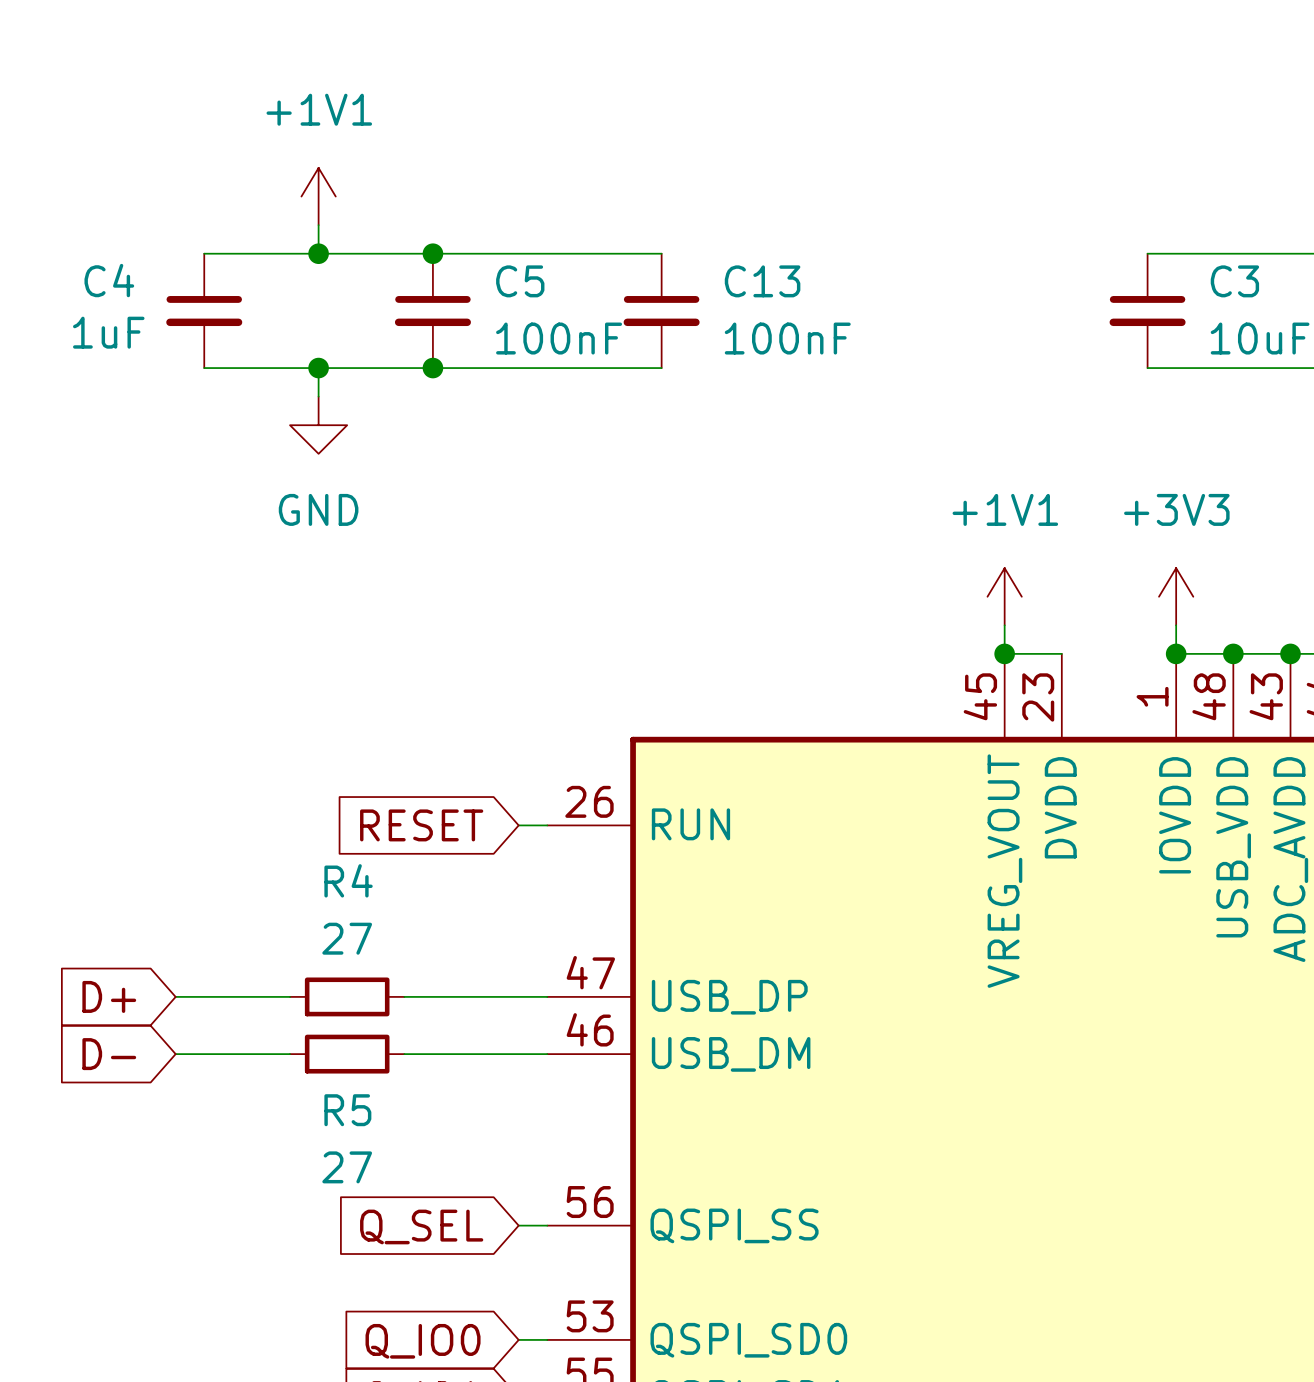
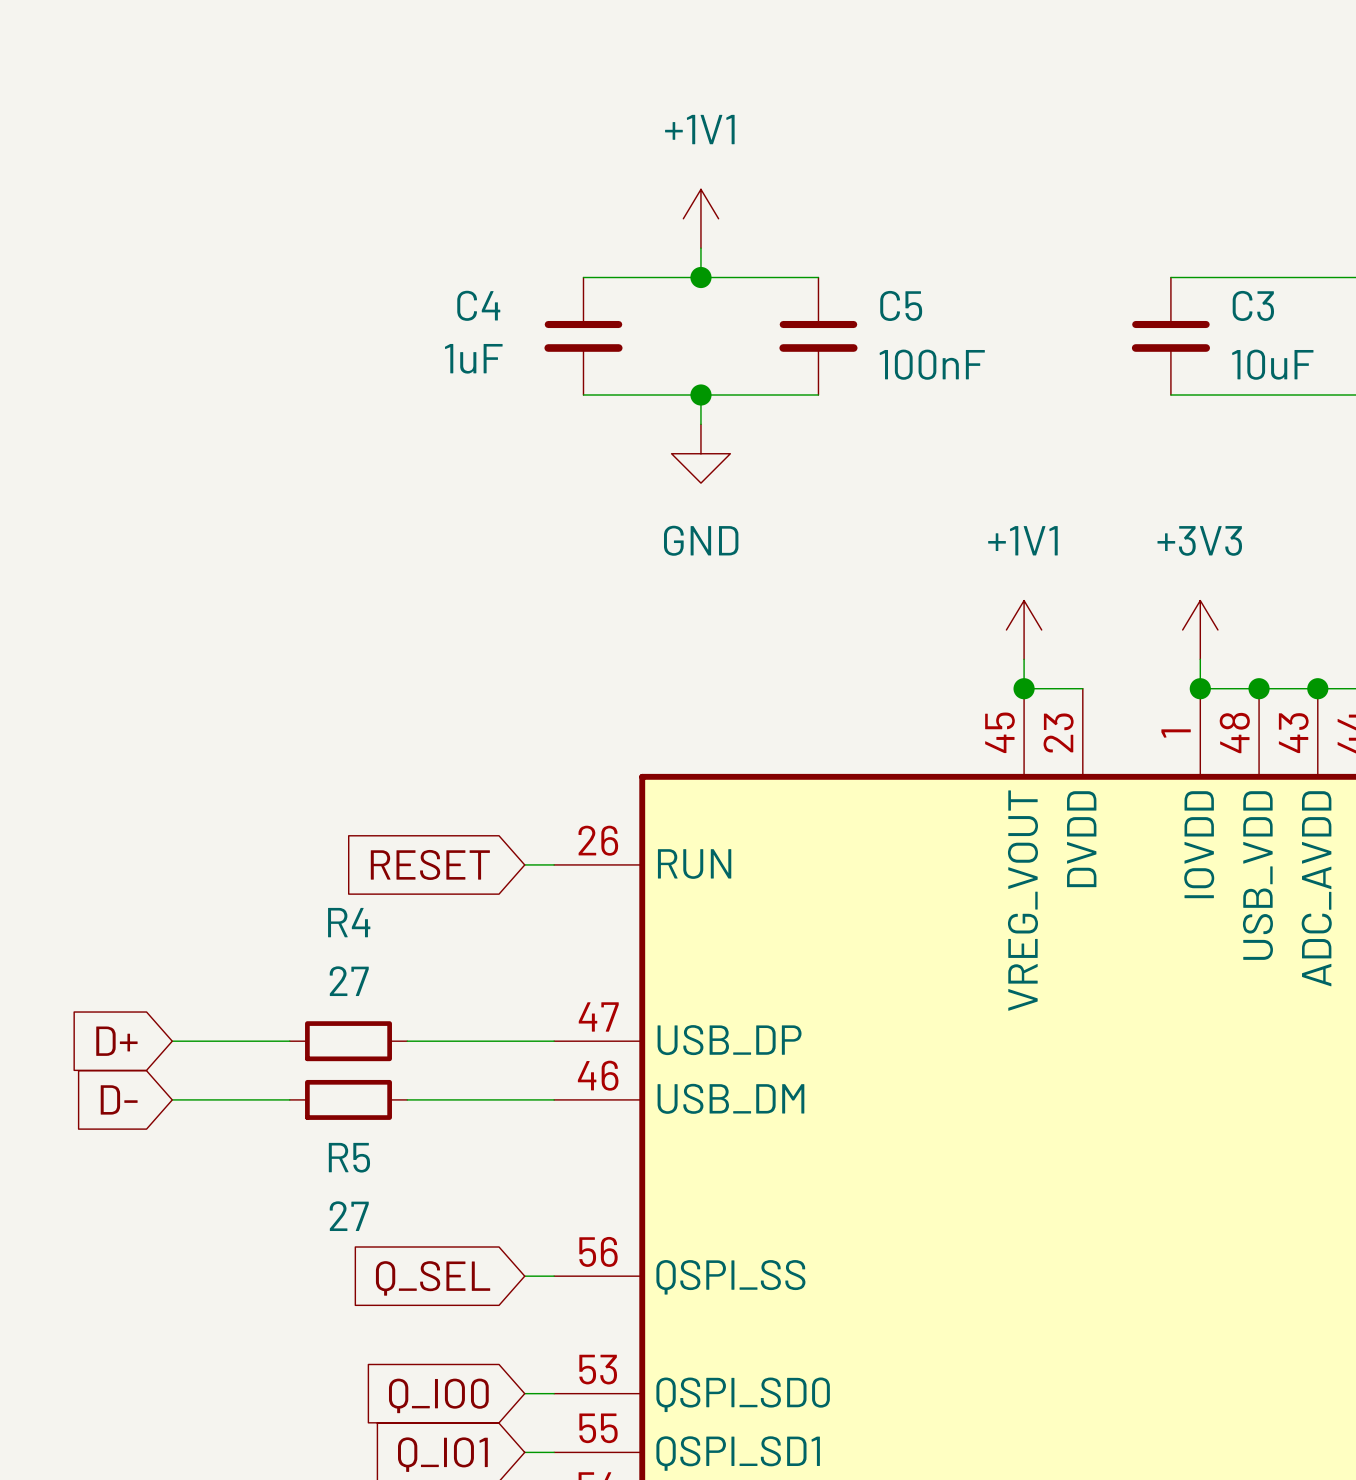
power symbol position: +1V1 (318, 196) -> +1V1 (700, 218)
wire: (318, 225) (318, 253) -> (700, 248) (700, 277)
wire: (204, 253) (575, 253) -> none
junction: (318, 253) -> none
junction: (432, 253) -> none
wire: none -> (671, 277) (818, 277)
junction: none -> (700, 277)
C4 position: (204, 310) -> (583, 336)
C5 position: (432, 310) -> (818, 336)
C13: 100nF (661, 310) -> none
wire: (204, 368) (575, 368) -> none
wire: (318, 368) (318, 396) -> (700, 394) (700, 424)
junction: (318, 368) -> none
junction: (432, 368) -> none
wire: none -> (671, 394) (818, 394)
junction: none -> (700, 394)
power symbol position: GND (318, 425) -> GND (700, 453)

